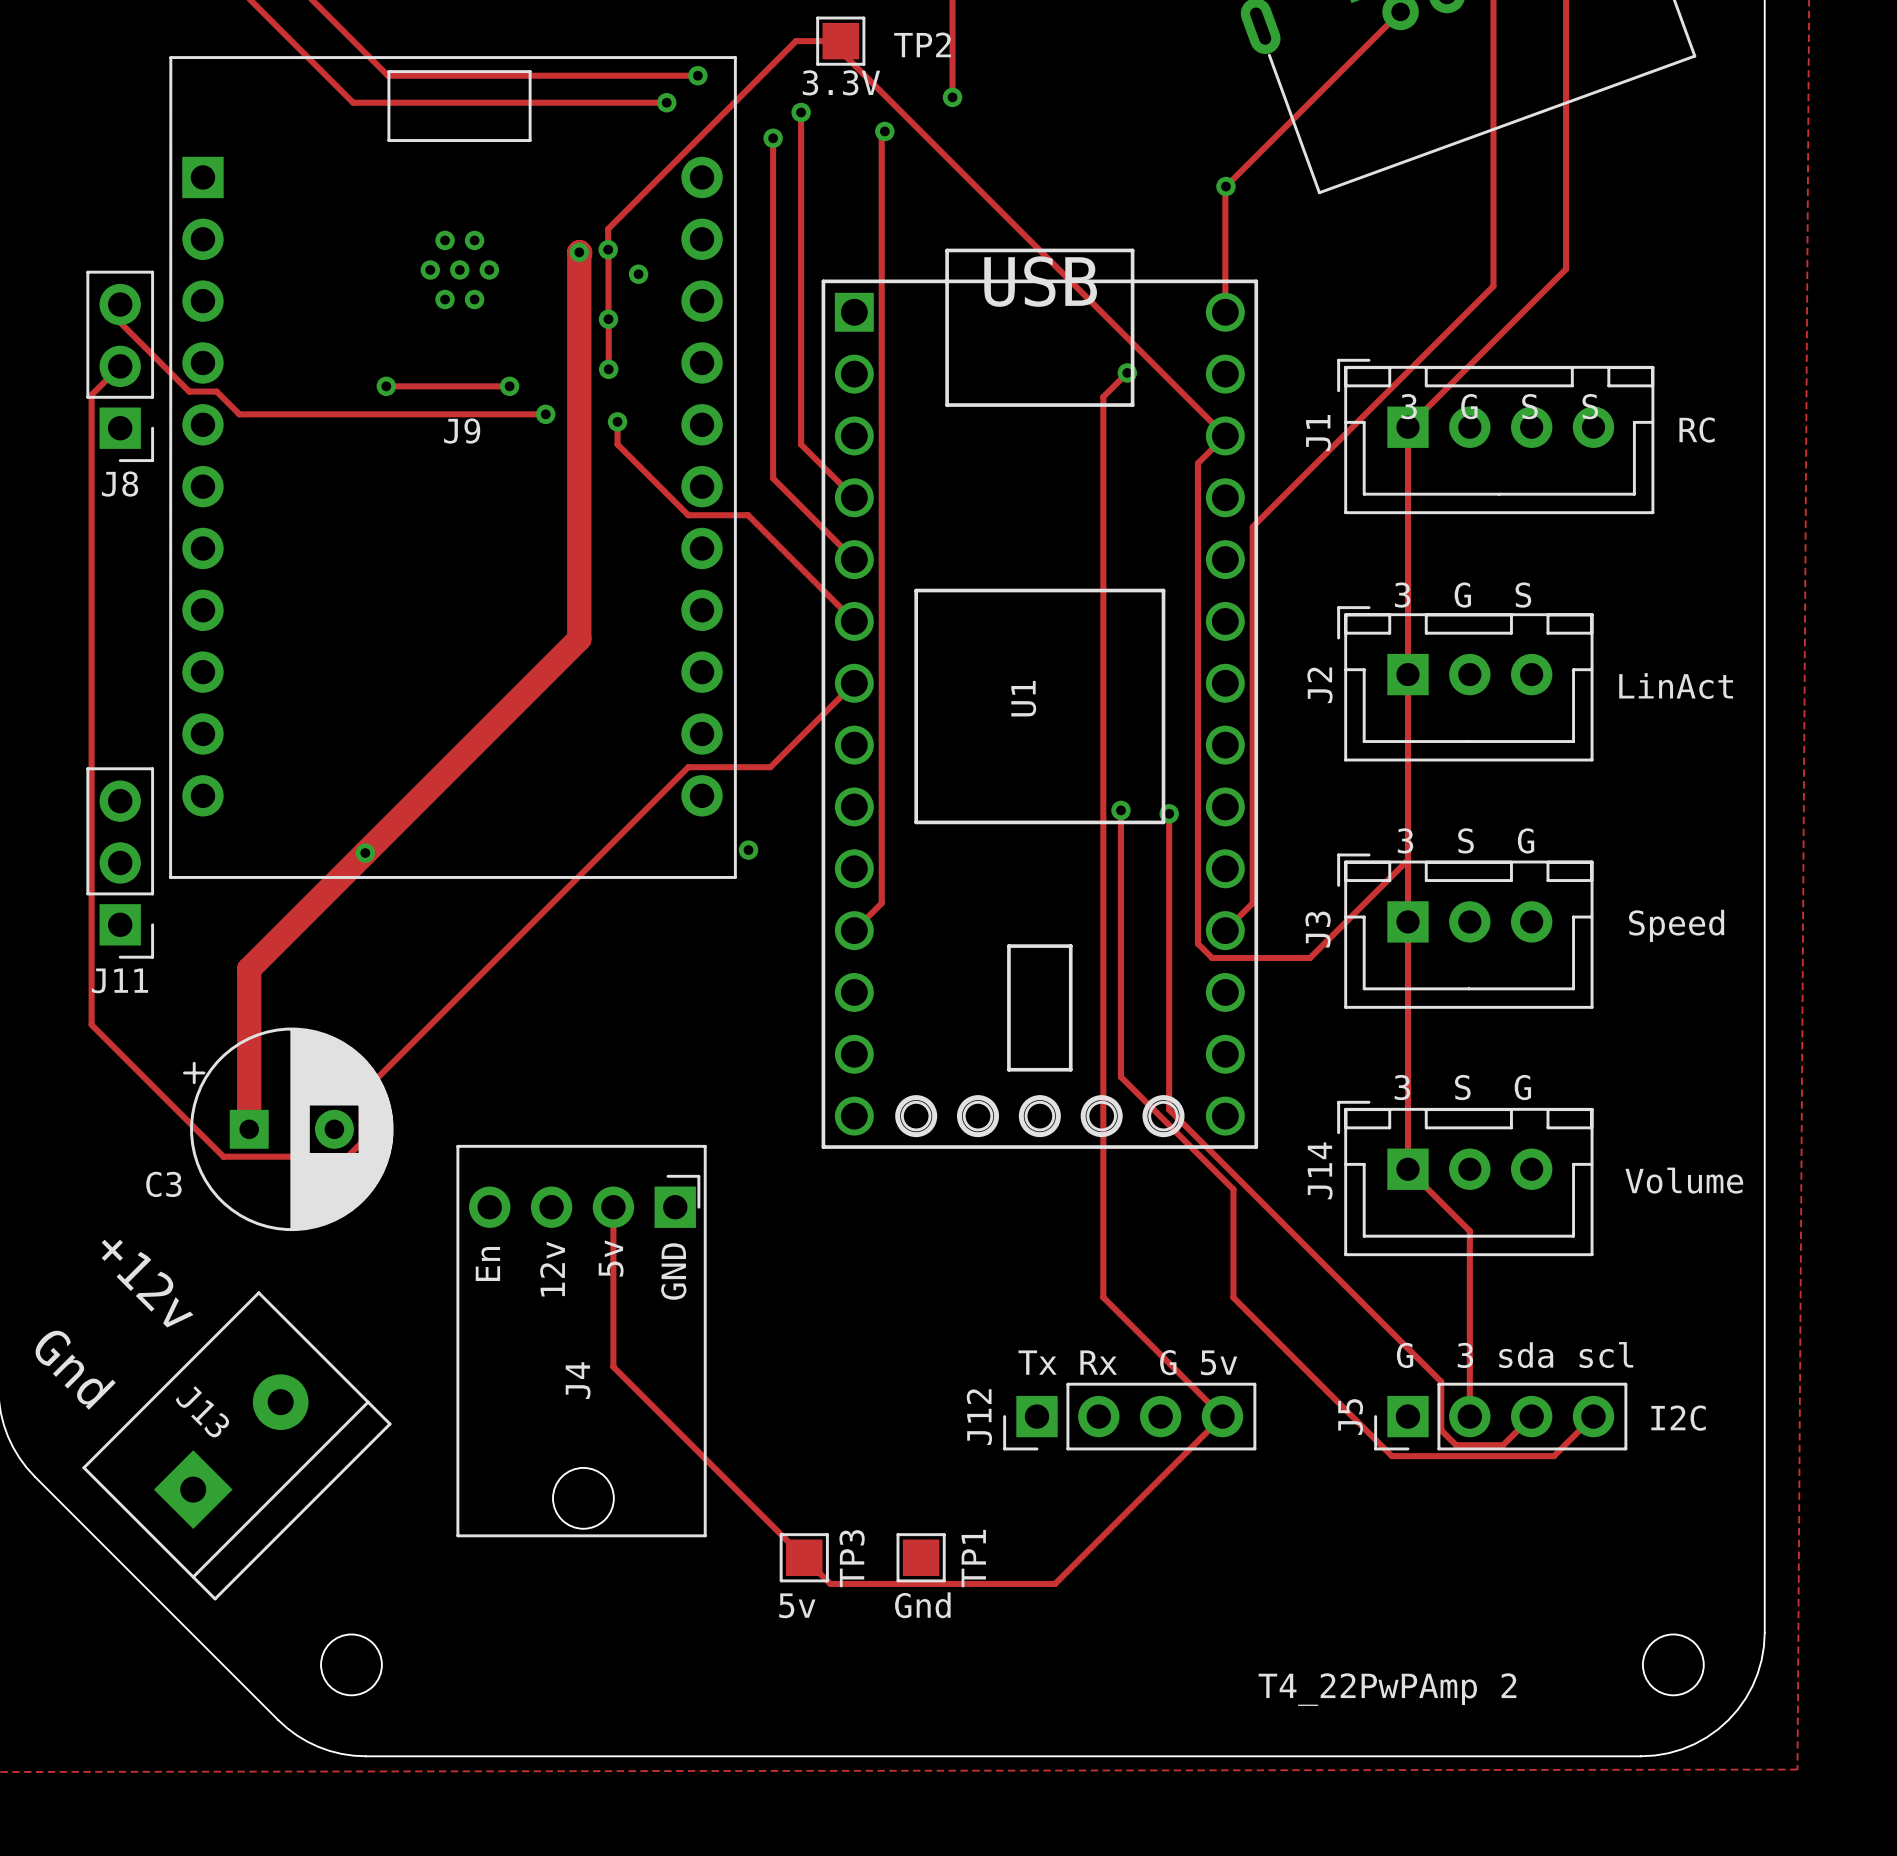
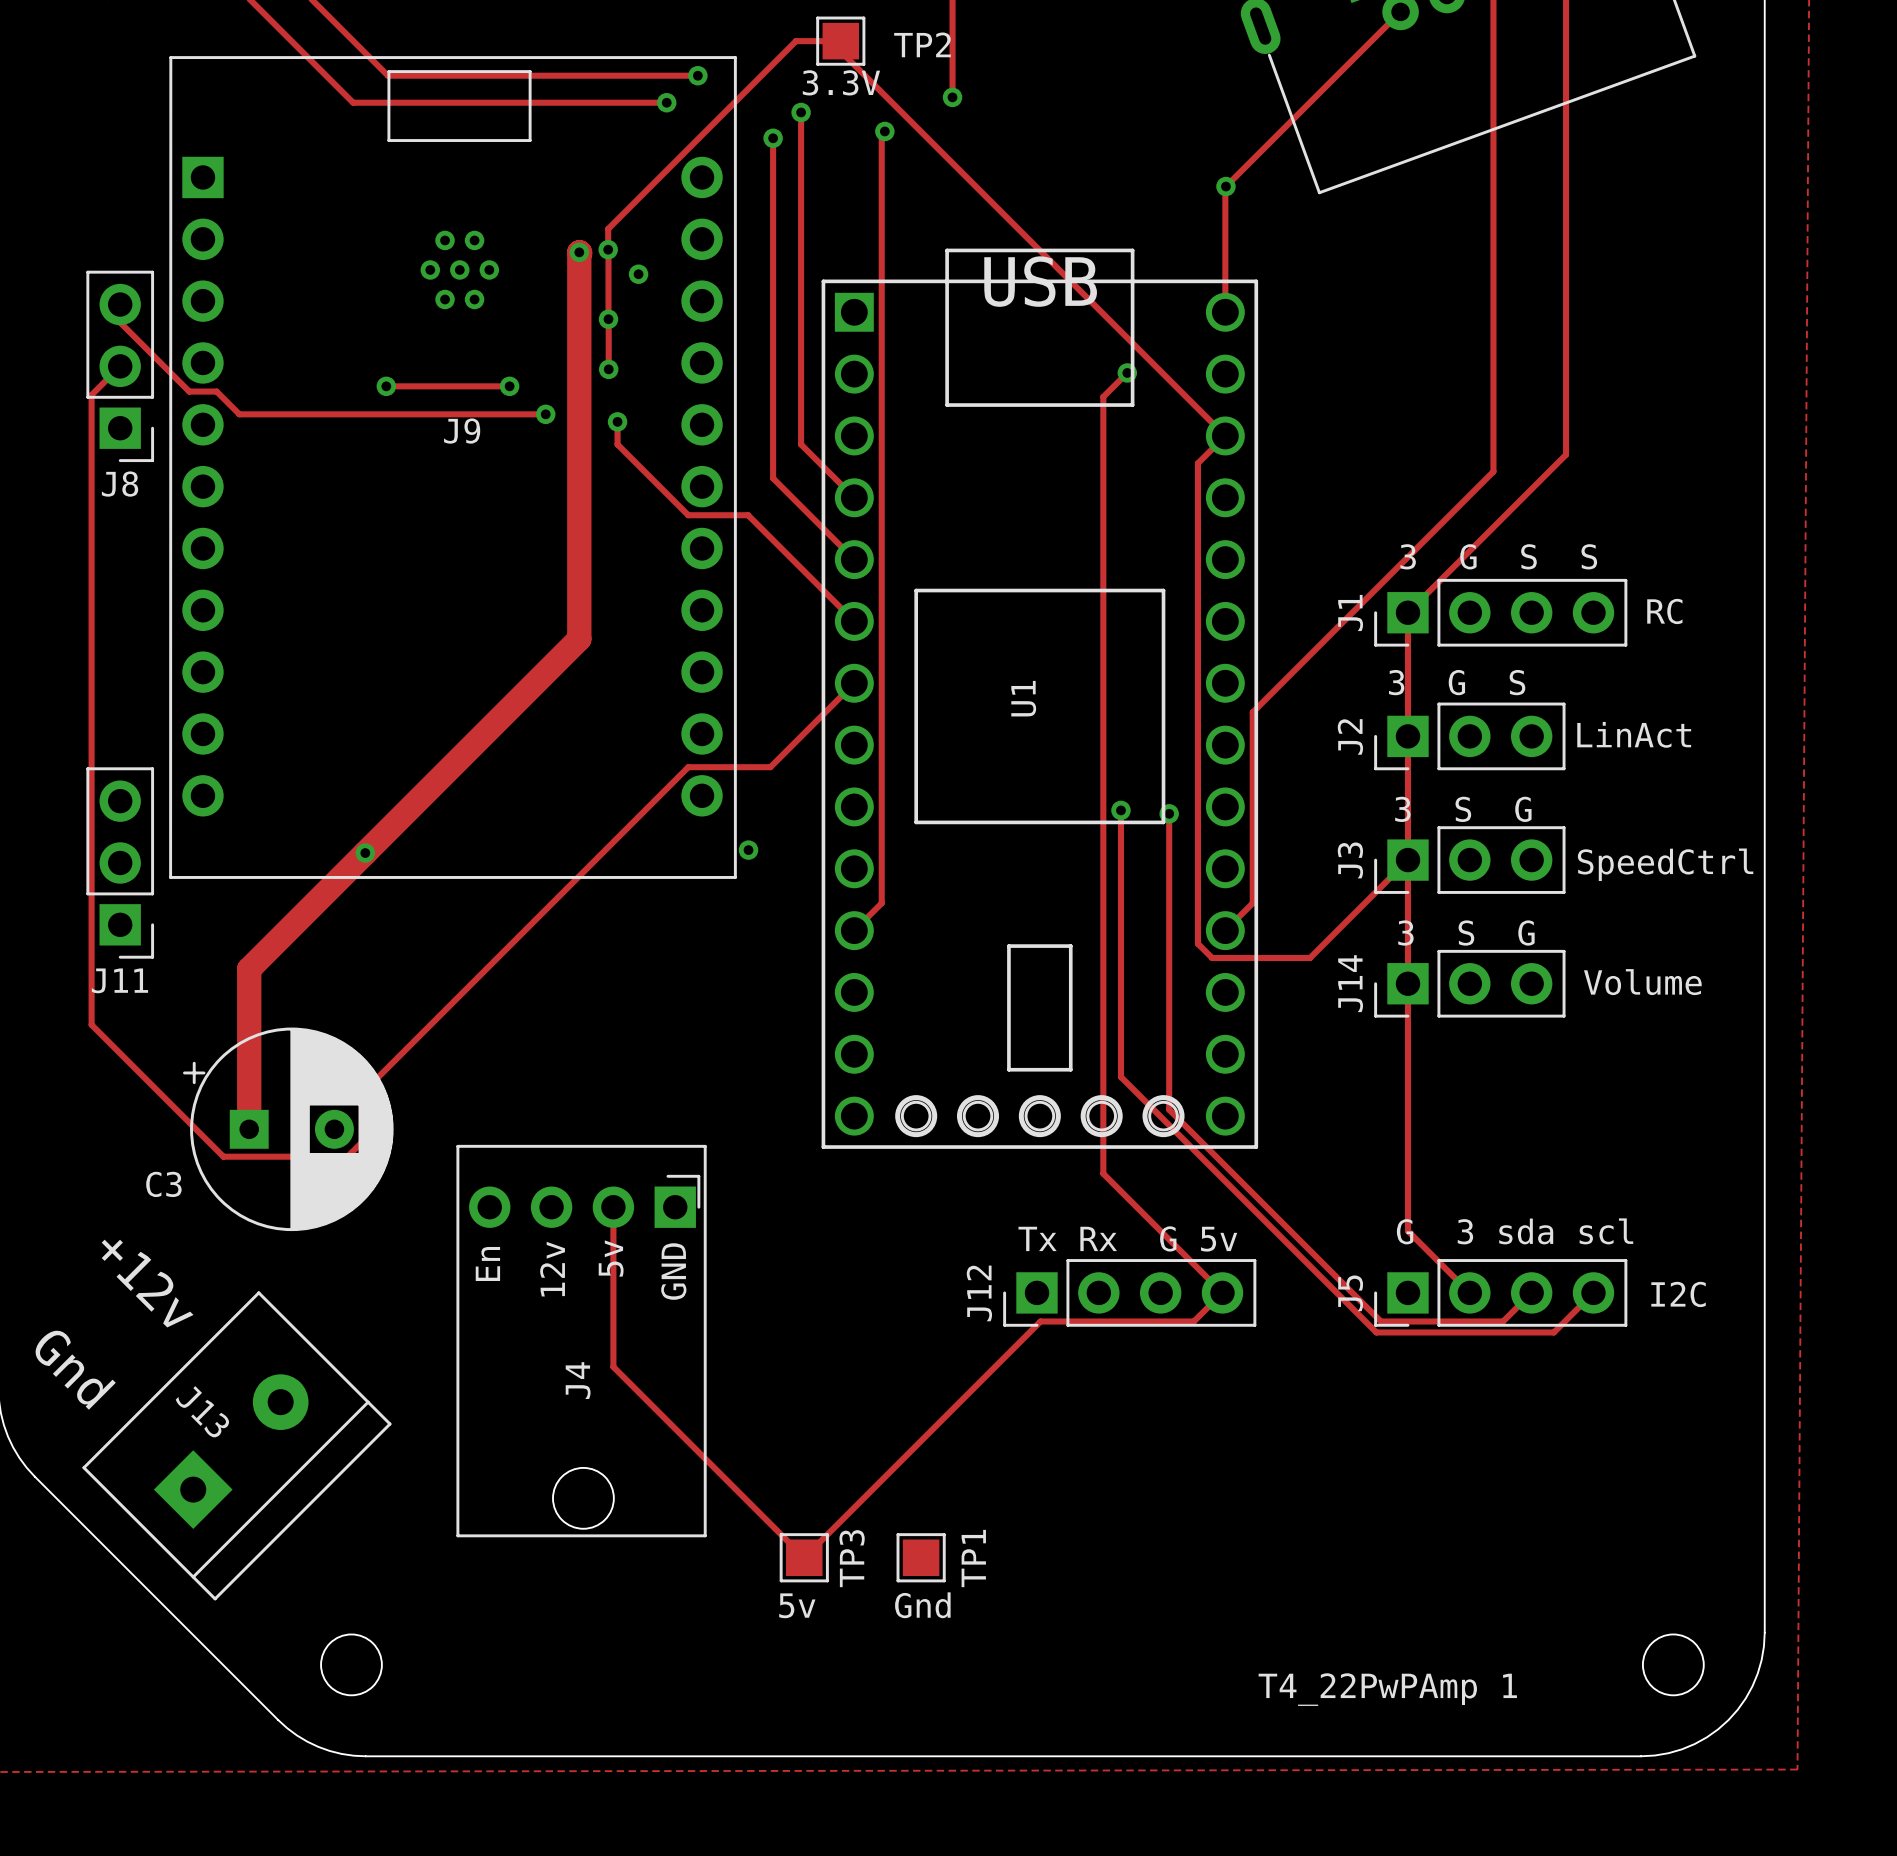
track: (1566, 269) (1408, 427) (1408, 612) -> (1566, 269) (1566, 454) (1408, 612)
track: (1493, 286) (1252, 526) (1252, 712) -> (1493, 286) (1493, 471) (1252, 712)
J1 footprint: [1337, 358, 1655, 515] -> [1374, 578, 1628, 647]
text position: 3 G S S (1499, 406) -> 3 G S S (1498, 556)
text position: 3 G S (1463, 595) -> 3 G S (1457, 682)
J2 footprint: [1337, 606, 1594, 762] -> [1374, 702, 1566, 771]
text position: 3 S G (1466, 840) -> 3 S G (1463, 809)
J3 footprint: [1337, 853, 1594, 1009] -> [1374, 826, 1566, 894]
J3 value: Speed (1676, 925) -> SpeedCtrl (1665, 864)
text: none -> 3 S G (1466, 933)
text: 3 S G (1462, 1087) -> none
J14 footprint: [1337, 1100, 1594, 1257] -> [1374, 949, 1566, 1018]
track: (1408, 1169) (1469, 1231) (1469, 1416) -> (1408, 1169) (1408, 1231) (1469, 1292)
track: (1103, 1173) (1103, 1297) (1222, 1416) (1055, 1583) (830, 1583) (804, 1557) -> (1103, 1173) (1222, 1292) (1193, 1321) (1040, 1321) (804, 1557)
track: (1233, 1189) (1233, 1297) (1391, 1456) (1553, 1456) (1593, 1416) -> (1233, 1189) (1376, 1332) (1553, 1332) (1593, 1292)
track: (1380, 1321) (1441, 1381) (1441, 1430) (1456, 1445) (1503, 1445) (1531, 1416) -> (1380, 1321) (1503, 1321) (1531, 1292)
text position: G 3 sda scl (1515, 1355) -> G 3 sda scl (1515, 1231)
text position: Tx Rx G 5v (1127, 1362) -> Tx Rx G 5v (1127, 1238)
J12 position: (1129, 1416) -> (1129, 1292)
J5 position: (1500, 1416) -> (1500, 1292)
text: T4_22PwPAmp 2 (1387, 1689) -> T4_22PwPAmp 1 (1387, 1689)

